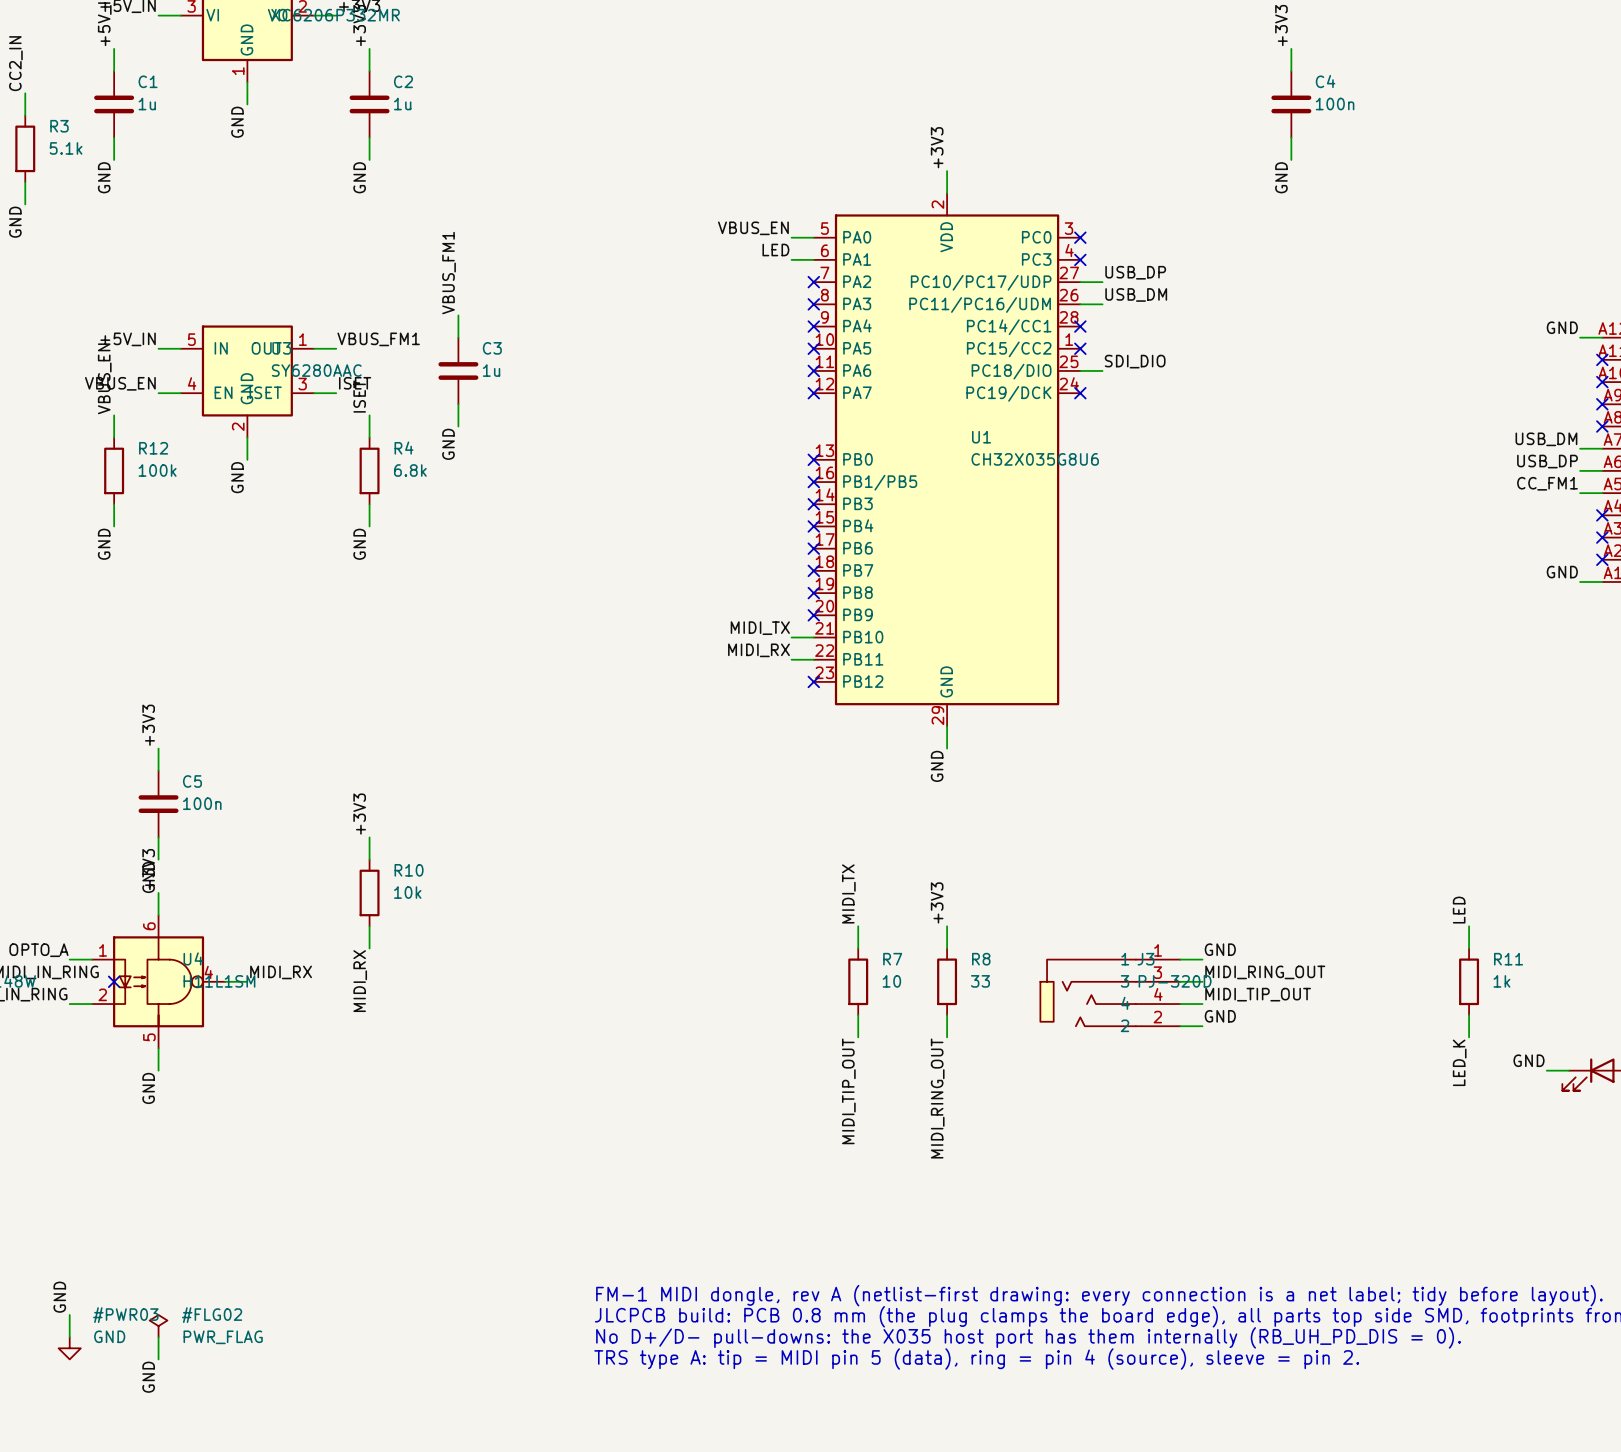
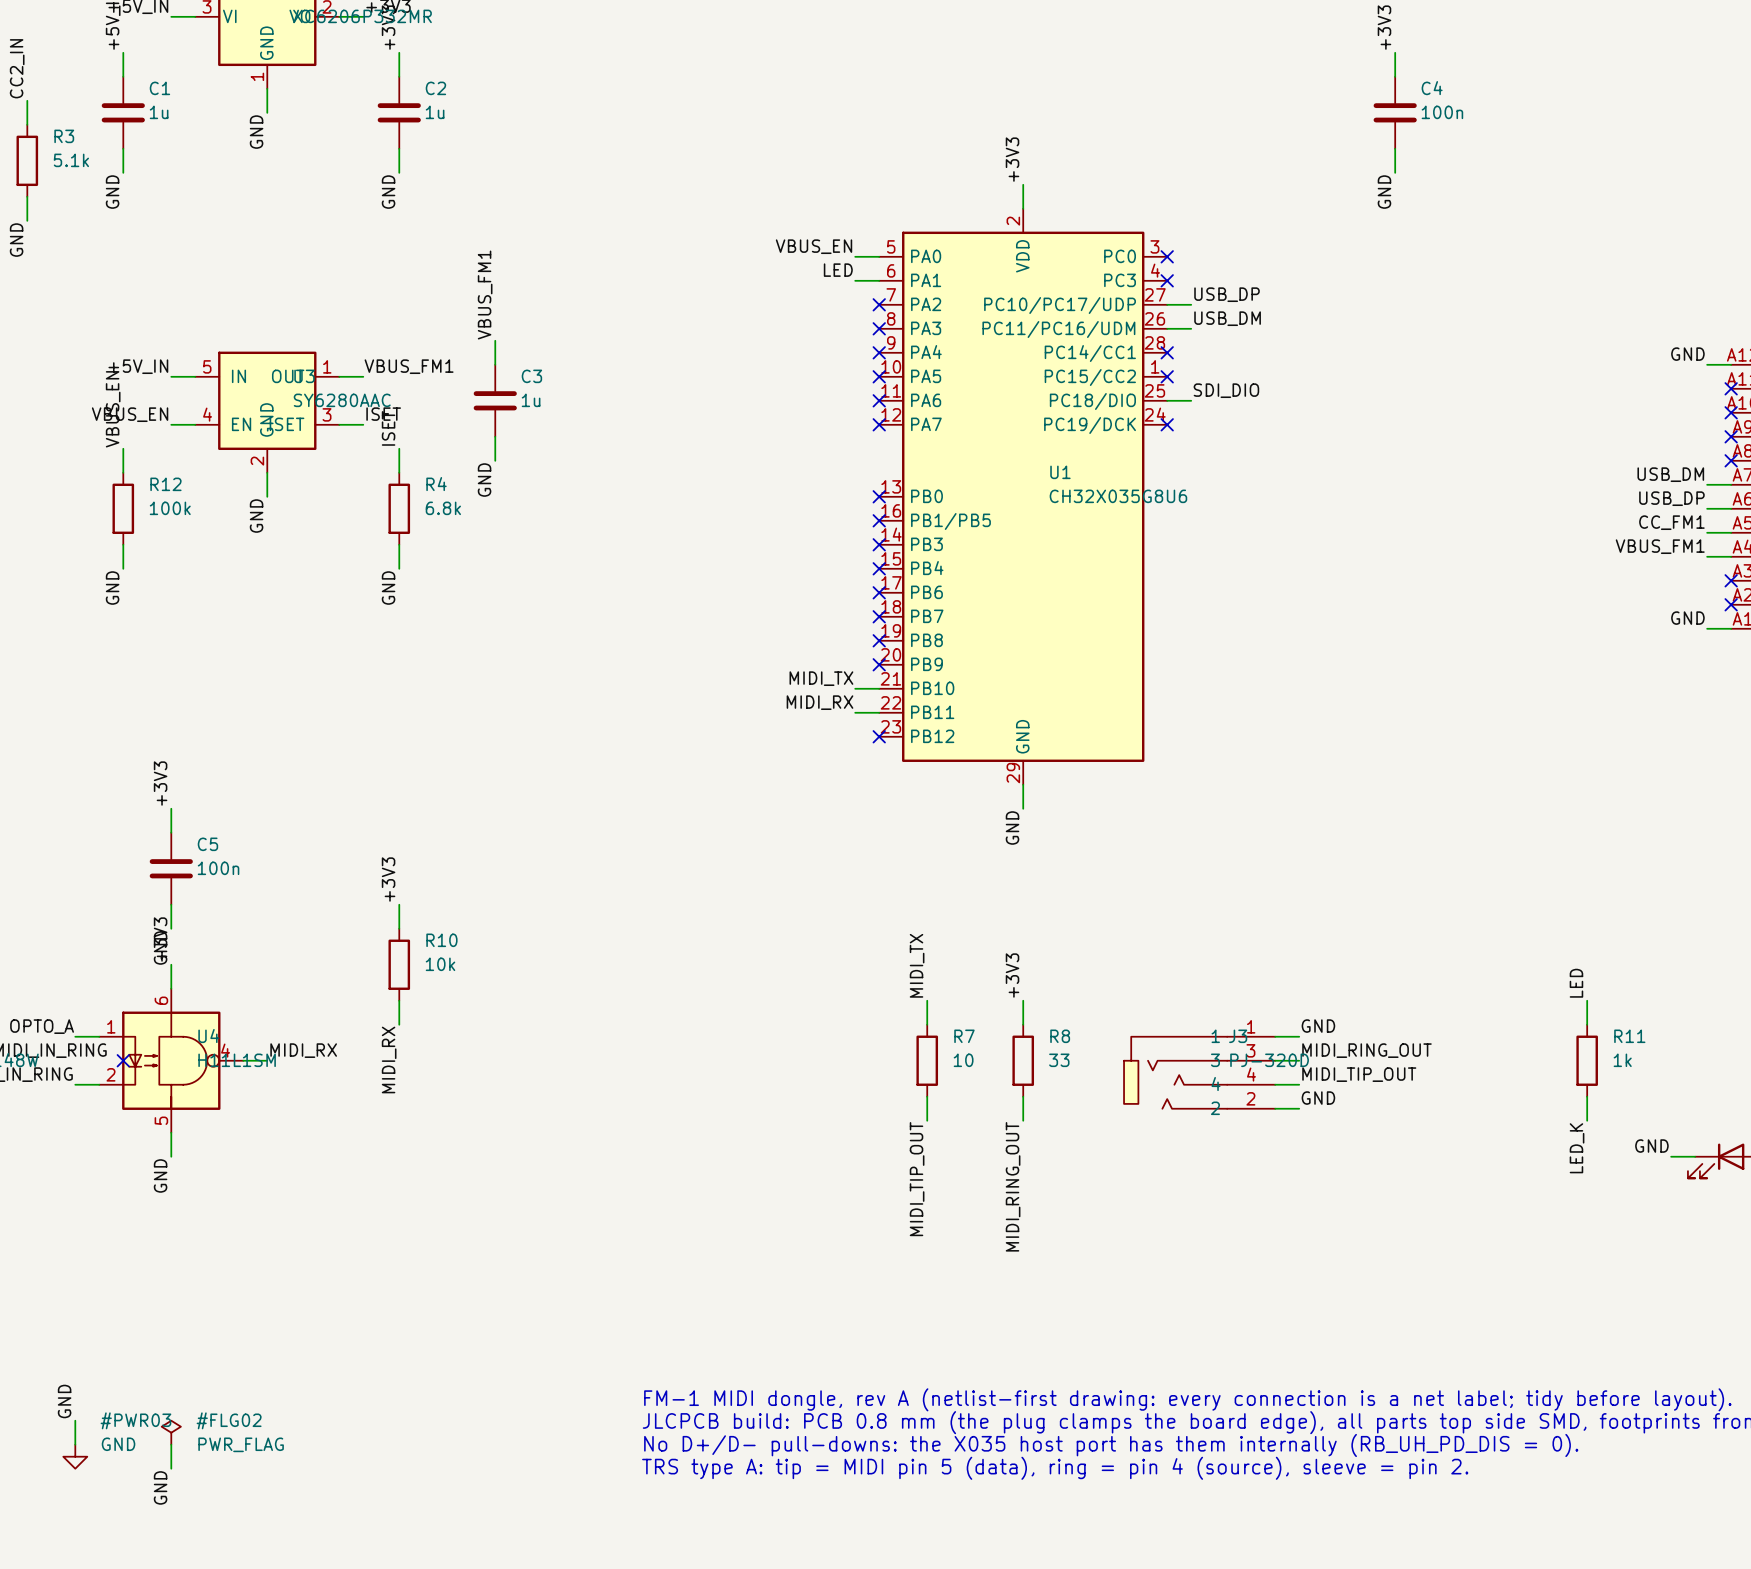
label: none -> VBUS_FM1 (1660, 546)
wire: none -> (1707, 556) (1731, 556)
no-connect mark: (1602, 515) -> none

